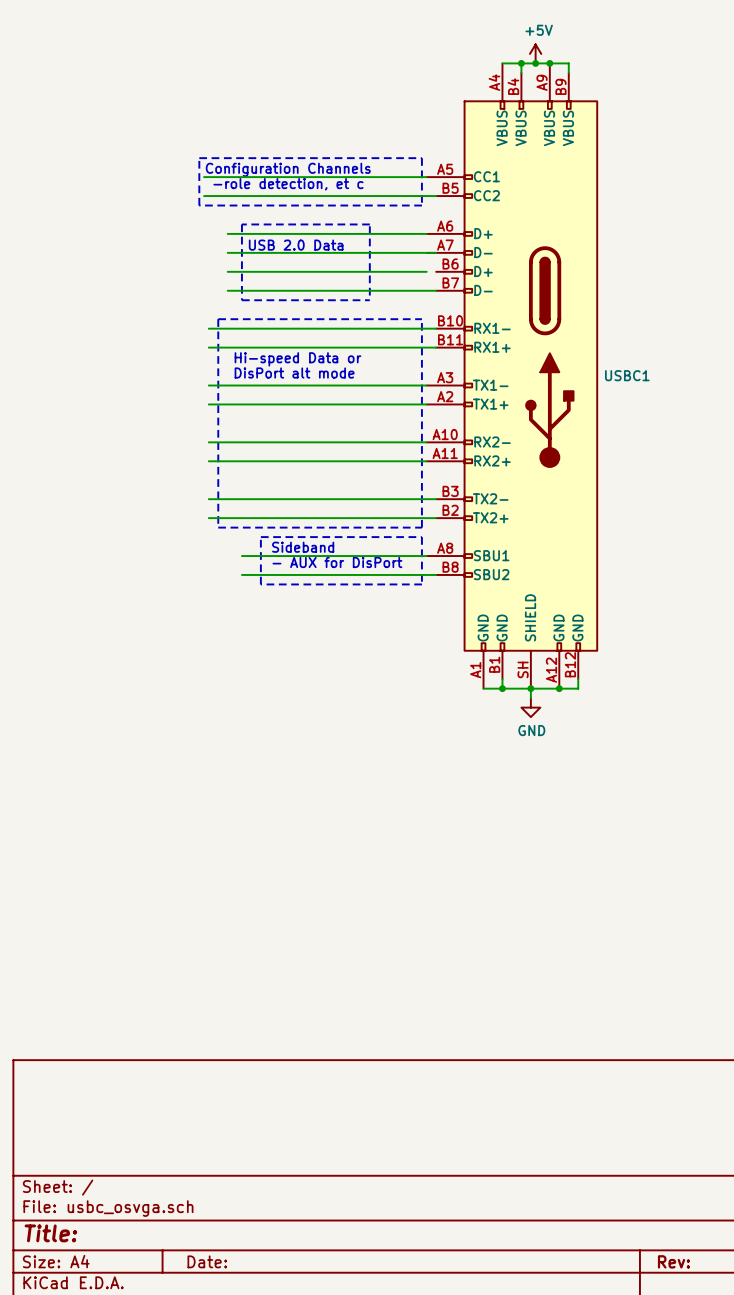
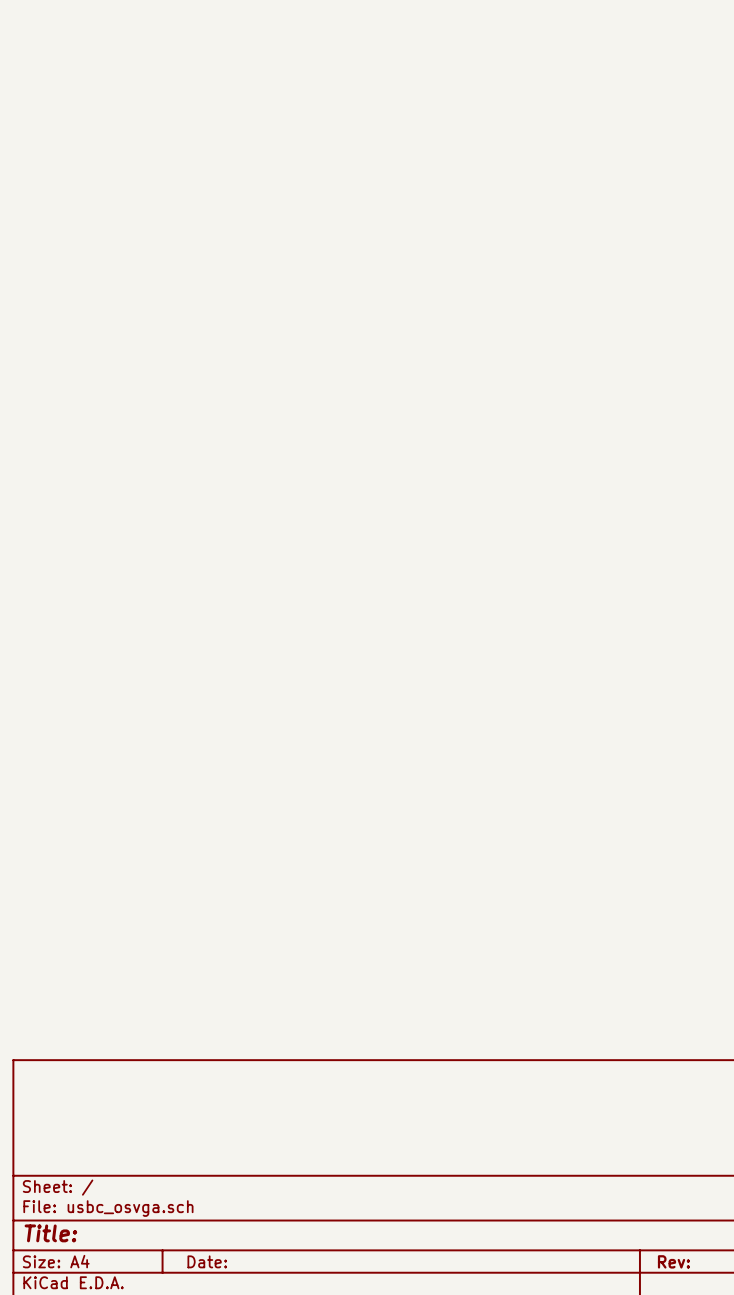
power symbol: +5V (535, 53) -> none
wire: (502, 63) (568, 63) (568, 72) -> none
wire: (521, 63) (521, 72) -> none
junction: (521, 63) -> none
junction: (535, 63) -> none
junction: (549, 63) -> none
line: (199, 158) (199, 205) (421, 205) (421, 158) (199, 158) -> none
text: Configuration Channels (288, 169) -> none
wire: (204, 177) (426, 177) -> none
text: -role detection, et c (288, 184) -> none
wire: (204, 196) (436, 196) -> none
wire: (227, 233) (426, 233) -> none
text: USB 2.0 Data (296, 245) -> none
wire: (227, 252) (436, 252) -> none
wire: (227, 271) (426, 271) -> none
wire: (227, 290) (436, 290) -> none
line: (369, 295) (369, 224) (241, 224) (241, 300) (369, 300) -> none
line: (218, 319) (218, 527) (421, 527) (421, 319) (218, 319) -> none
wire: (208, 328) (436, 328) -> none
wire: (208, 347) (436, 347) -> none
text: Hi-speed Data or (297, 359) -> none
text: DisPort alt mode (294, 373) -> none
USBC1: (512, 376) -> none
wire: (208, 385) (426, 385) -> none
wire: (208, 404) (426, 404) -> none
wire: (208, 442) (426, 442) -> none
wire: (208, 461) (426, 461) -> none
wire: (208, 499) (436, 499) -> none
wire: (208, 518) (436, 518) -> none
line: (260, 537) (421, 537) (421, 584) (260, 584) (260, 537) -> none
text: Sideband (303, 547) -> none
wire: (241, 556) (426, 556) -> none
text: - AUX for DisPort (337, 562) -> none
wire: (241, 574) (436, 574) -> none
wire: (502, 679) (502, 688) -> none
wire: (578, 679) (578, 688) (483, 688) -> none
junction: (502, 688) -> none
wire: (530, 688) (530, 698) -> none
junction: (530, 688) -> none
junction: (559, 688) -> none
power symbol: GND (530, 707) -> none

